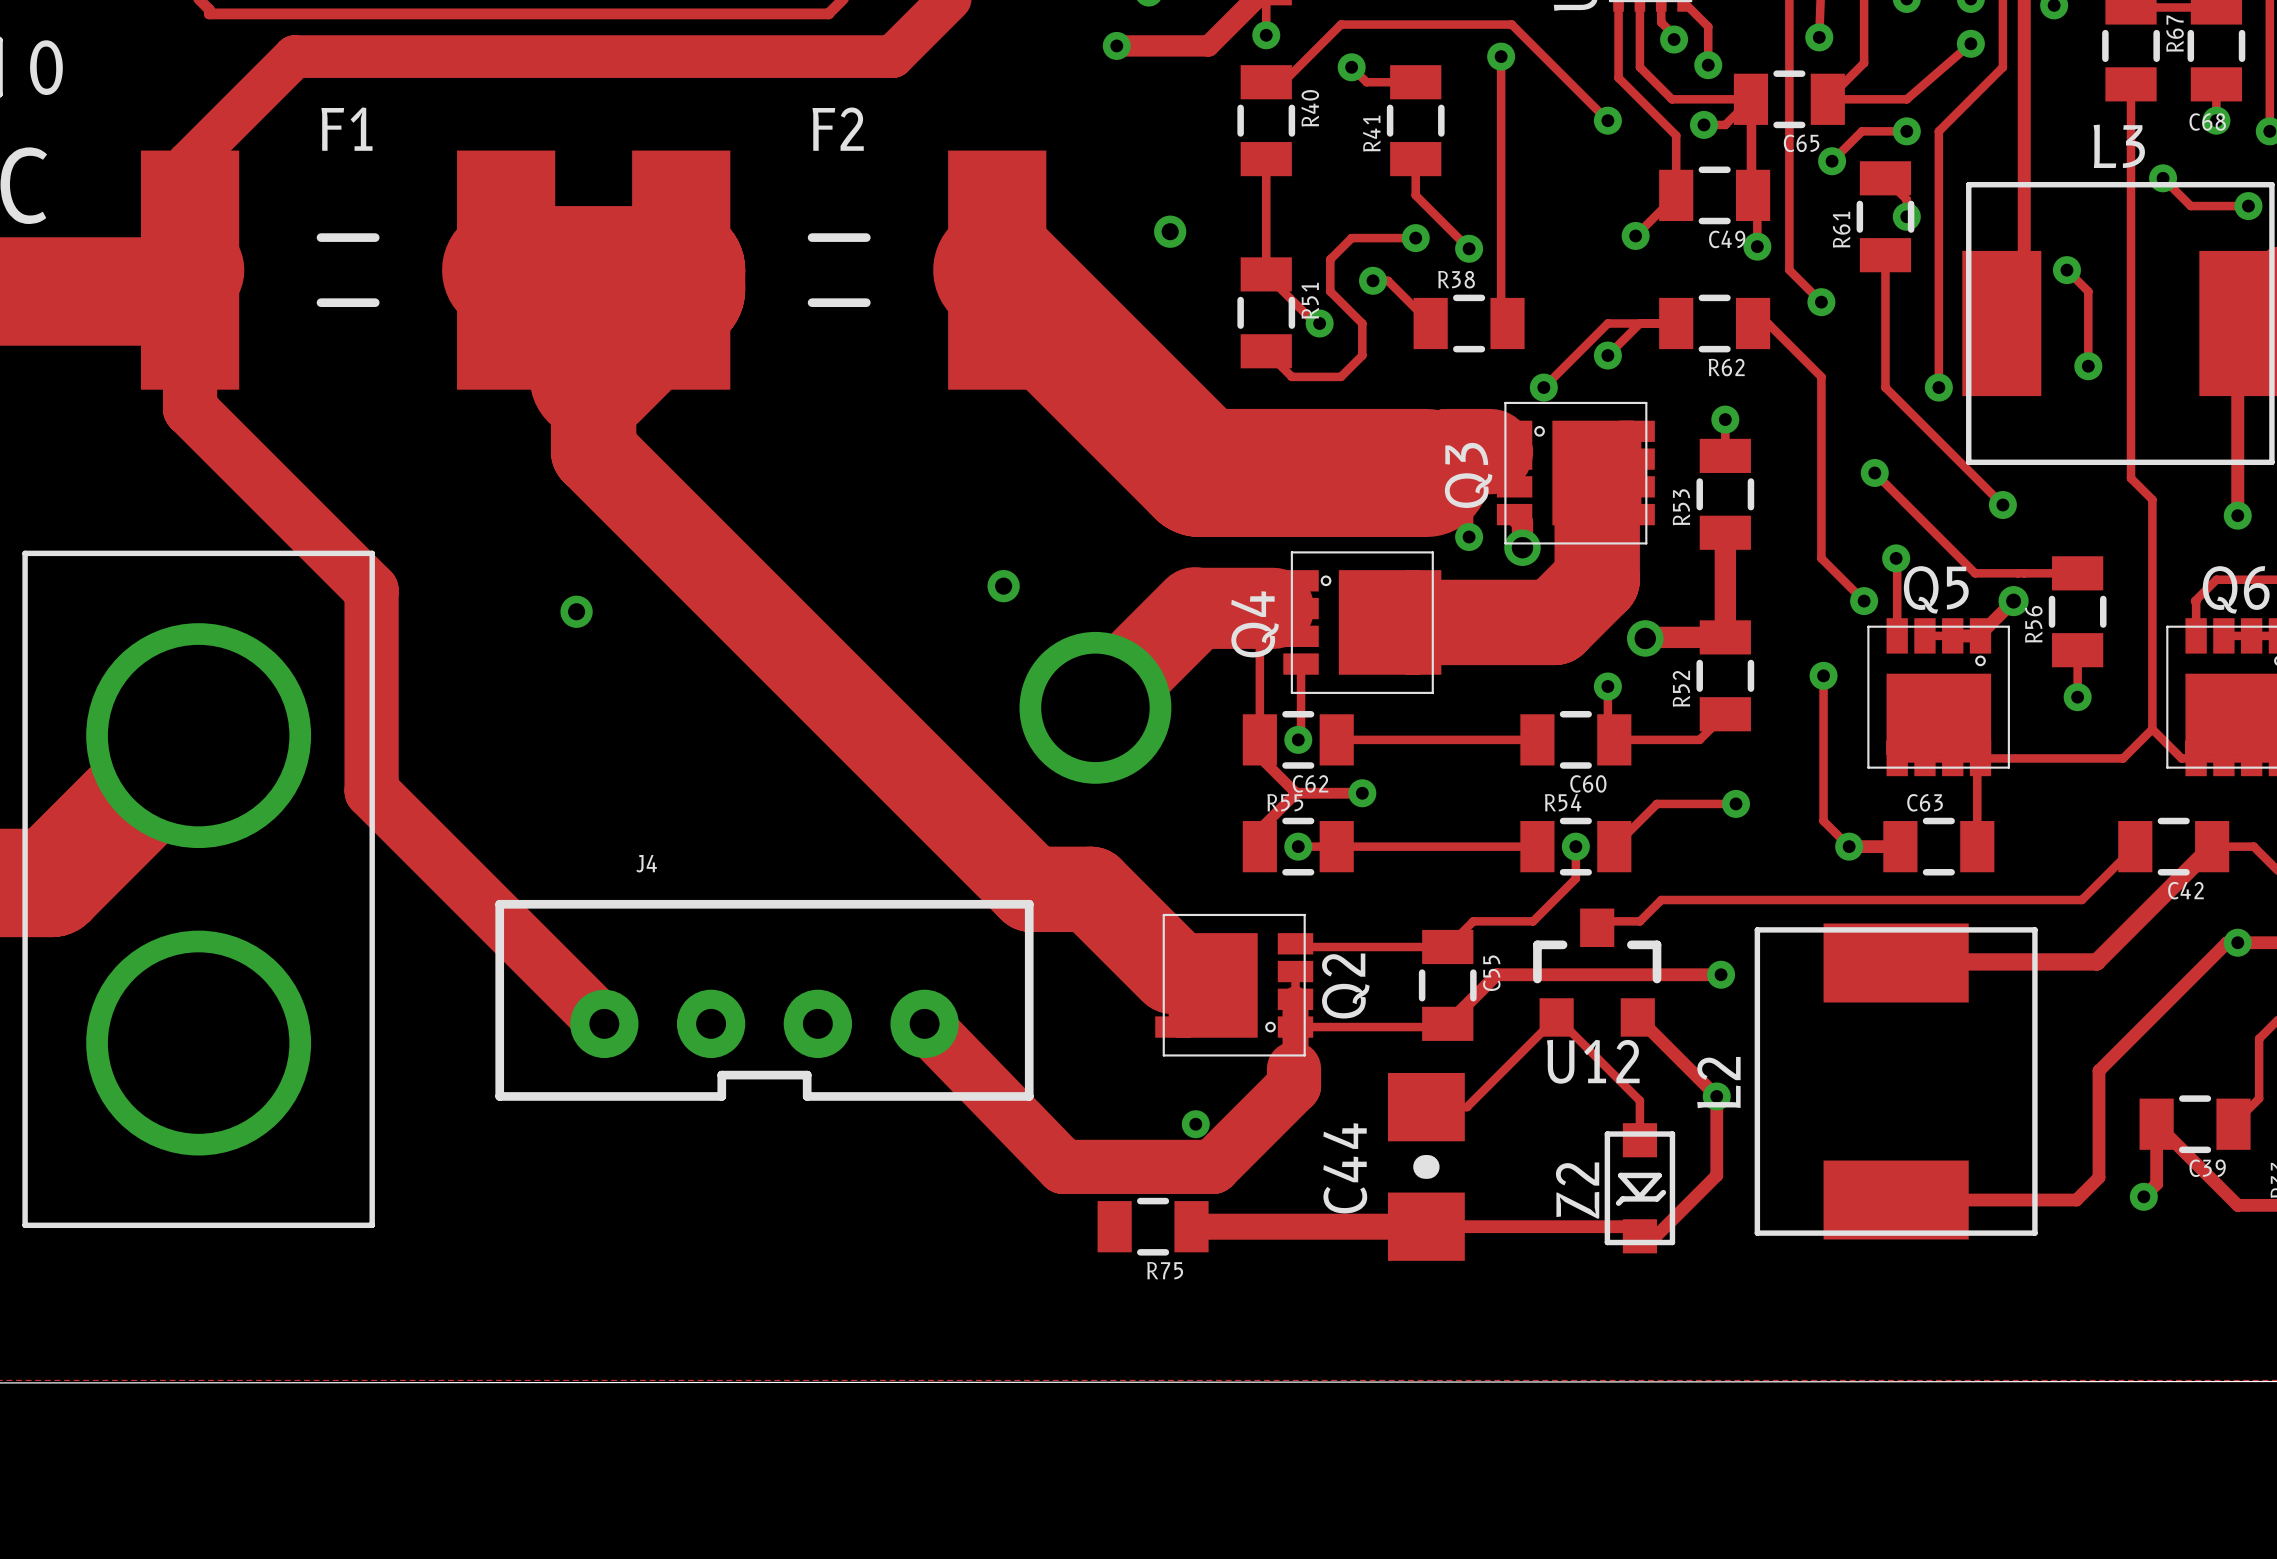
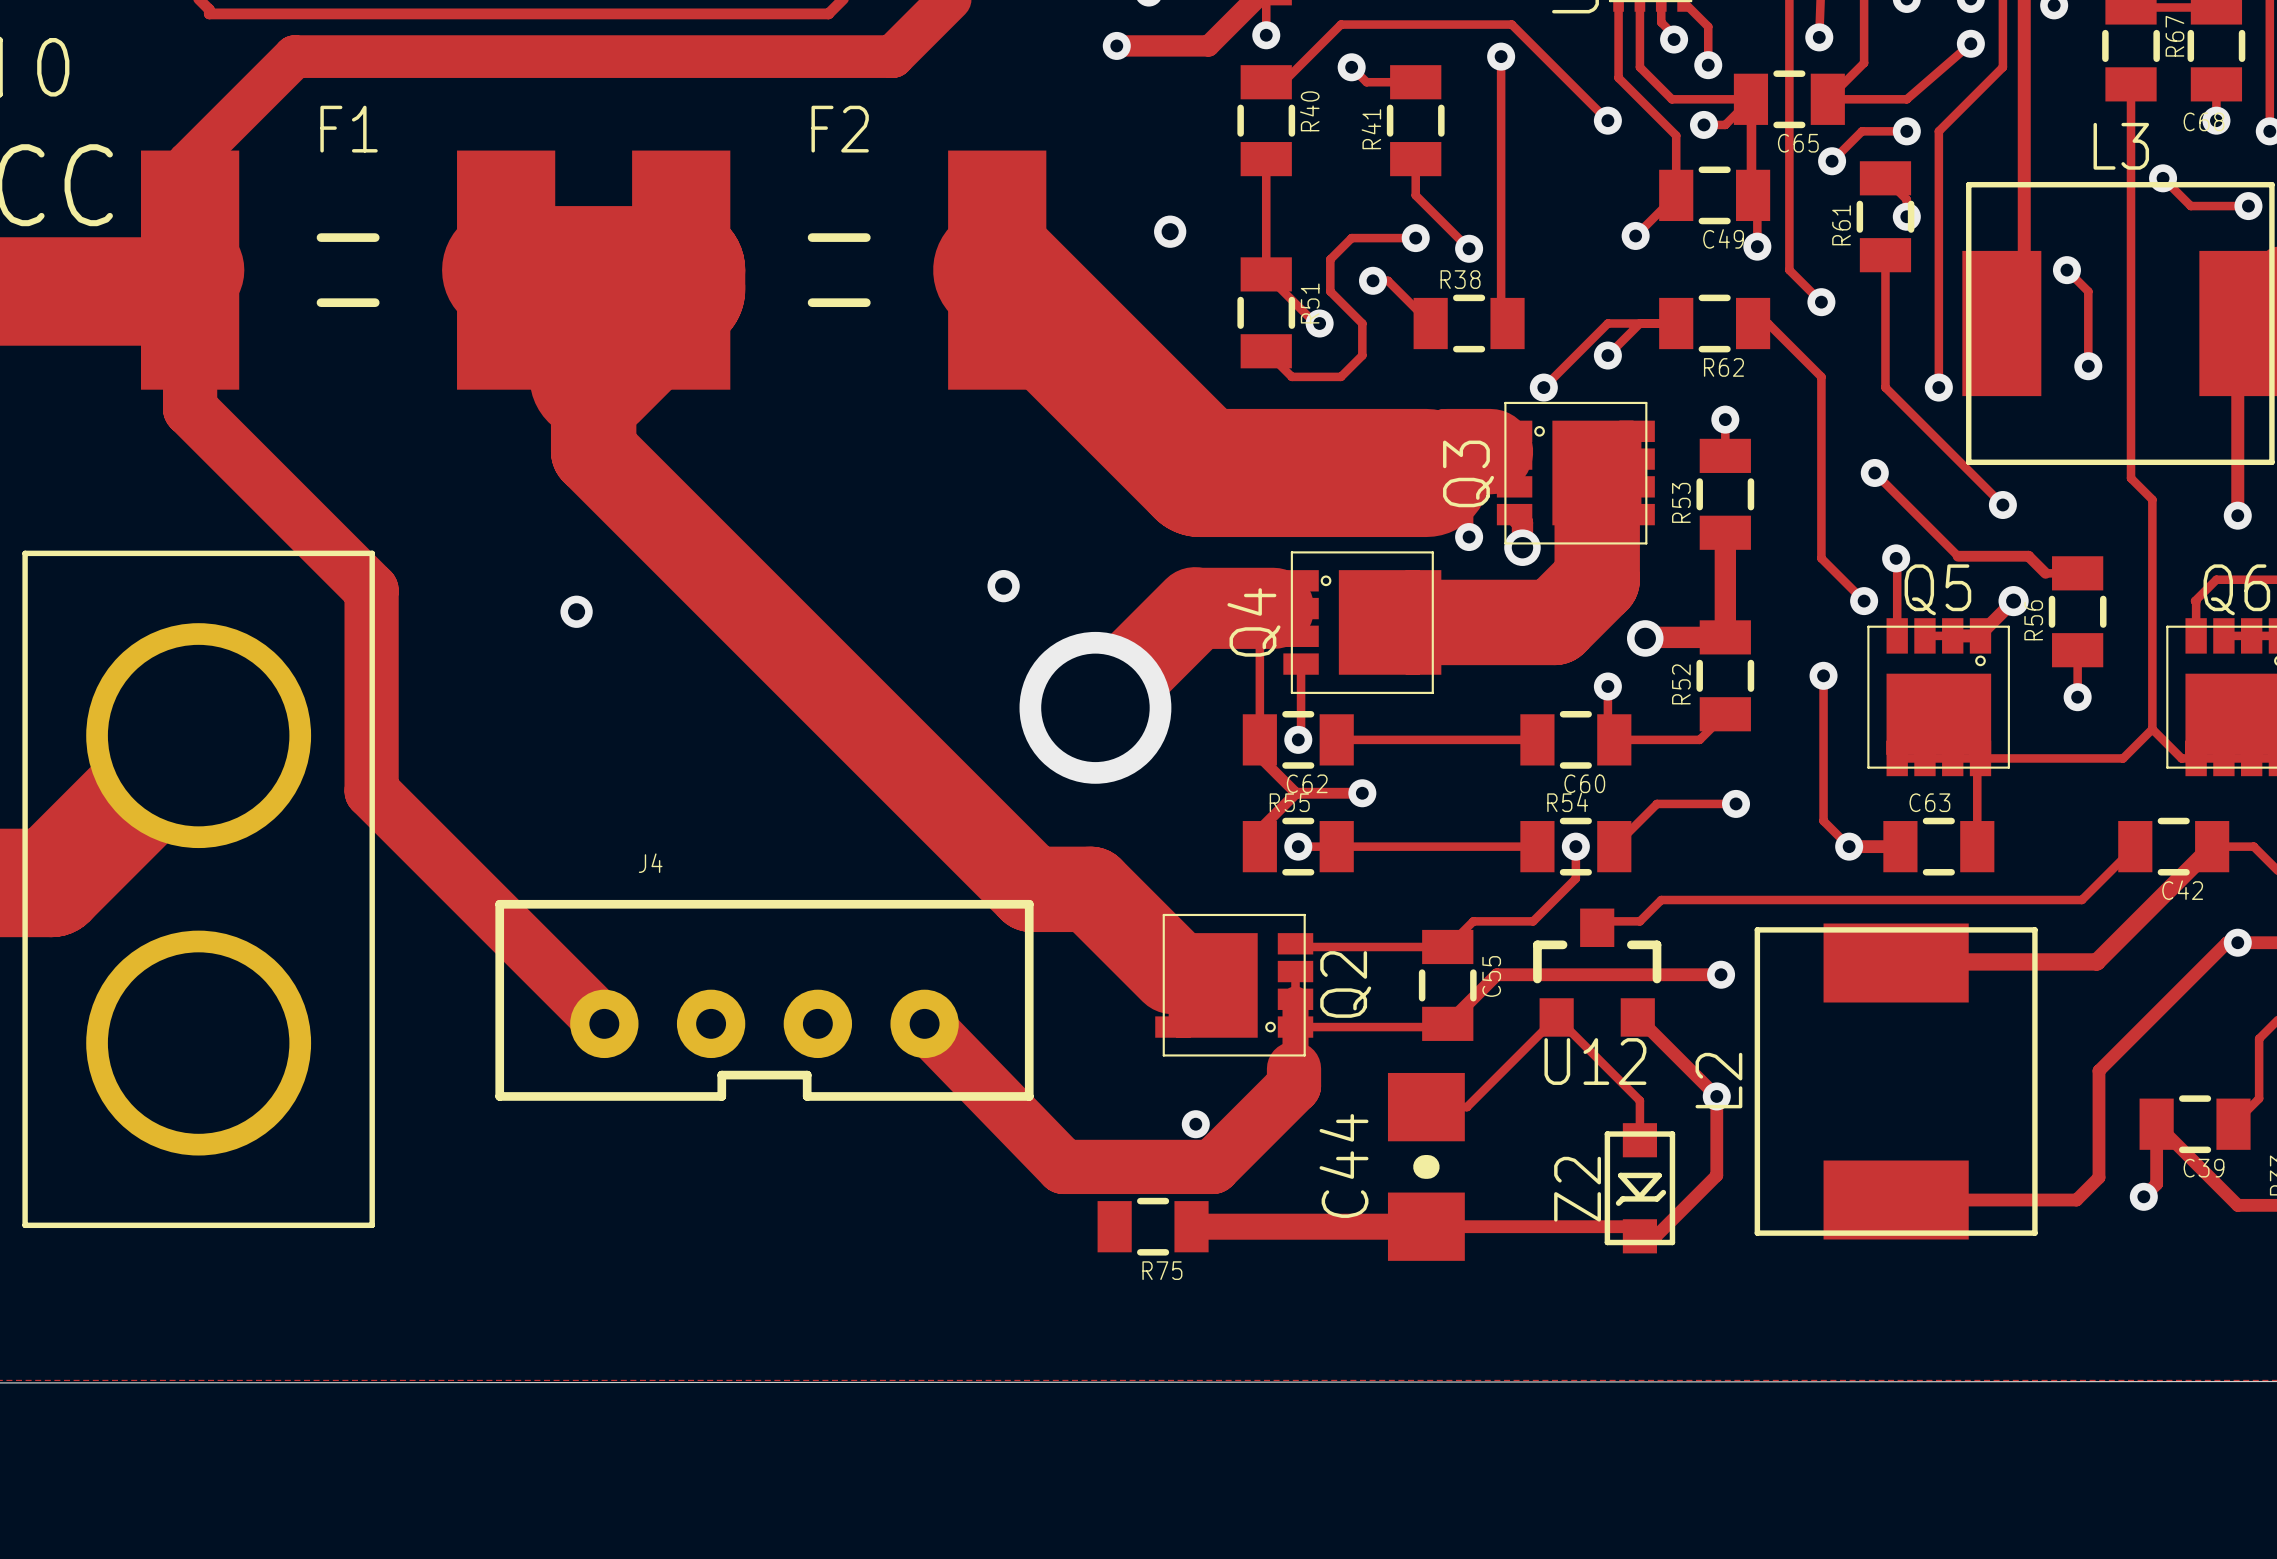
track: (1958, 556) (1975, 573) (2045, 573) -> (1958, 556) (2028, 556) (2045, 573)

